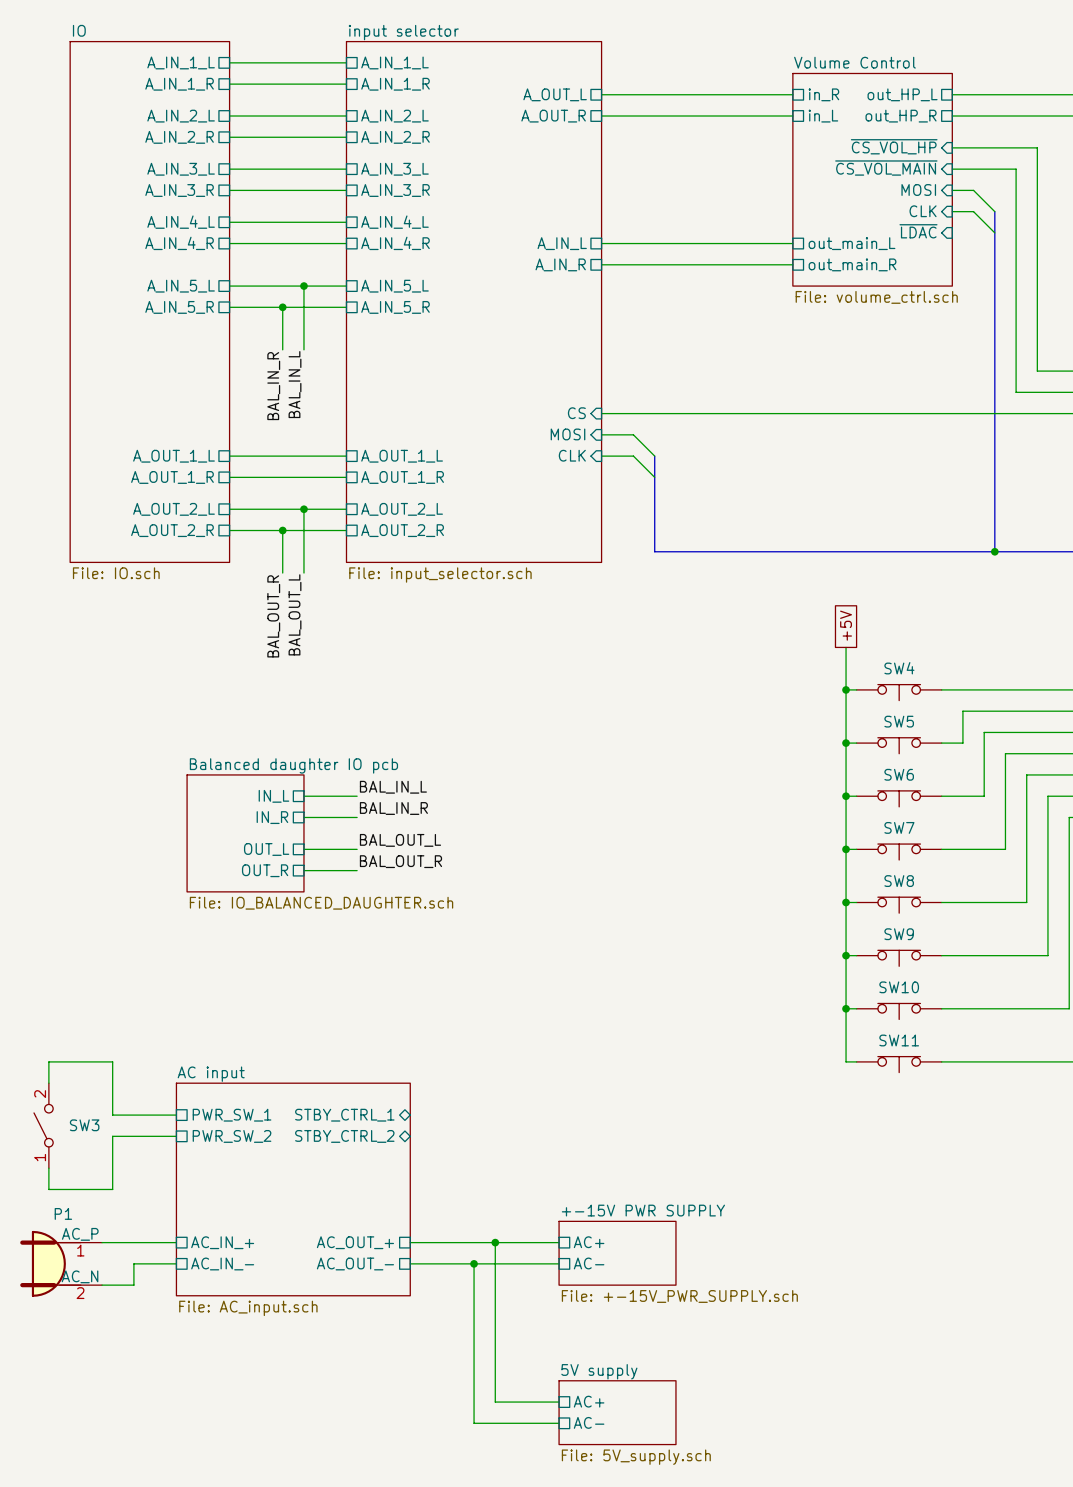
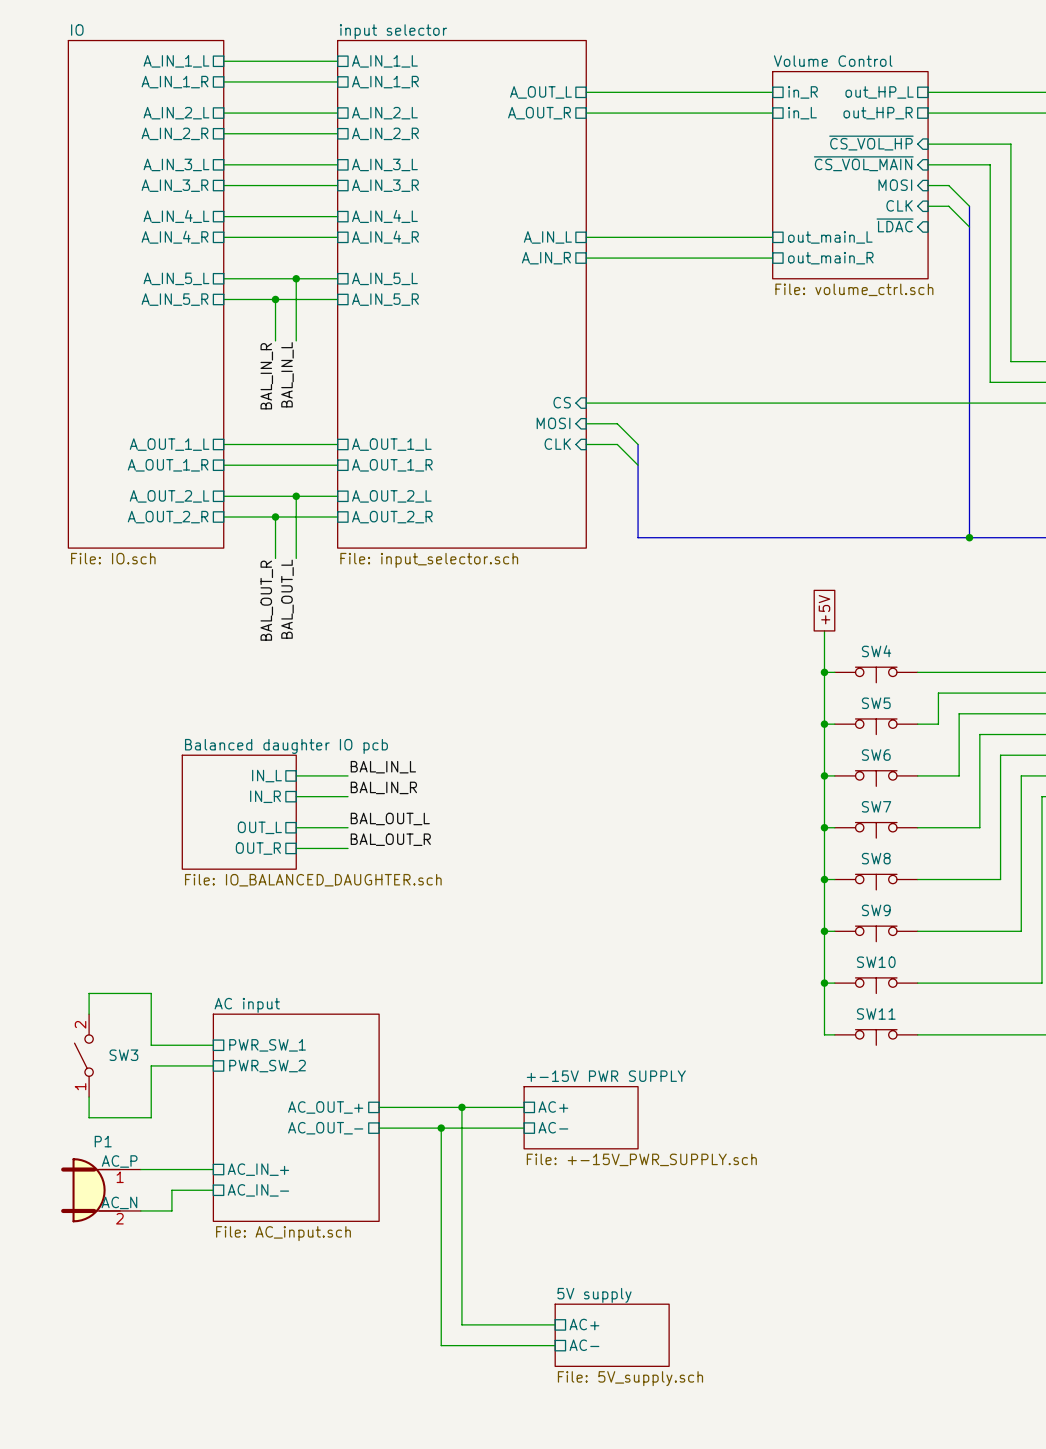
wire: (48, 1083) (48, 1061) (112, 1061) (112, 1115) (176, 1115) -> (89, 1014) (89, 993) (151, 993) (151, 1045) (213, 1045)
sheet pin position: PWR_SW_1 (232, 1115) -> PWR_SW_1 (267, 1045)
sheet pin: STBY_CTRL_1 (344, 1115) -> none
SW3 position: (43, 1125) -> (83, 1055)
sheet pin: none -> AC+ (553, 1107)
wire: (176, 1136) (112, 1136) (112, 1189) (48, 1189) (48, 1168) -> (213, 1065) (151, 1065) (151, 1117) (89, 1117) (89, 1097)
sheet pin position: PWR_SW_2 (232, 1136) -> PWR_SW_2 (267, 1066)
sheet pin: STBY_CTRL_2 (344, 1136) -> none
wire: none -> (461, 1107) (461, 1231)
junction: none -> (461, 1107)
sheet AC input: none -> File: AC_input.sch (296, 1117)
wire: none -> (441, 1128) (441, 1345) (555, 1345)
junction: none -> (441, 1128)
sheet pin: none -> AC- (553, 1127)
sheet AC input: File: AC_input.sch (293, 1189) -> none
wire: none -> (140, 1169) (213, 1169)
wire: none -> (213, 1190) (171, 1190) (171, 1210)
sheet pin position: AC_IN_+ (222, 1242) -> AC_IN_+ (258, 1169)
sheet pin position: AC_OUT_+ (355, 1242) -> AC_OUT_+ (325, 1107)
wire: (410, 1242) (559, 1242) -> (379, 1107) (524, 1107)
wire: (495, 1242) (495, 1402) (559, 1402) -> none
junction: (495, 1242) -> none
sheet pin: AC+ (589, 1242) -> none
sheet +-15V PWR SUPPLY position: (617, 1253) -> (581, 1117)
P1 position: (61, 1263) -> (100, 1190)
wire: (176, 1263) (133, 1263) (133, 1285) (102, 1285) -> none
sheet pin position: AC_IN_- (222, 1263) -> AC_IN_- (258, 1190)
sheet pin position: AC_OUT_- (355, 1263) -> AC_OUT_- (325, 1128)
wire: (410, 1263) (559, 1263) -> (379, 1128) (524, 1128)
junction: (474, 1263) -> none
sheet pin: AC- (589, 1263) -> none
wire: (474, 1359) (474, 1423) (559, 1423) -> (461, 1324) (555, 1324)
sheet pin position: AC+ (589, 1401) -> AC+ (584, 1324)
sheet 5V supply position: (617, 1412) -> (612, 1335)
sheet pin position: AC- (589, 1422) -> AC- (584, 1345)

